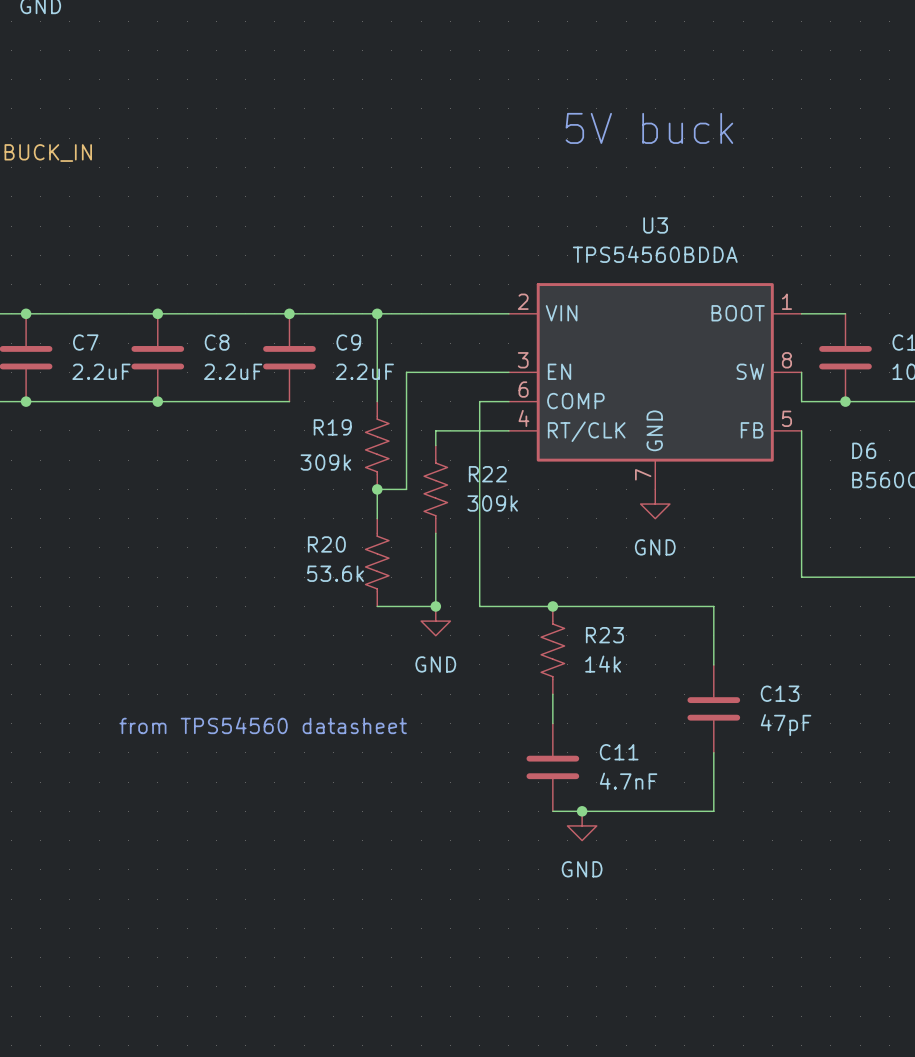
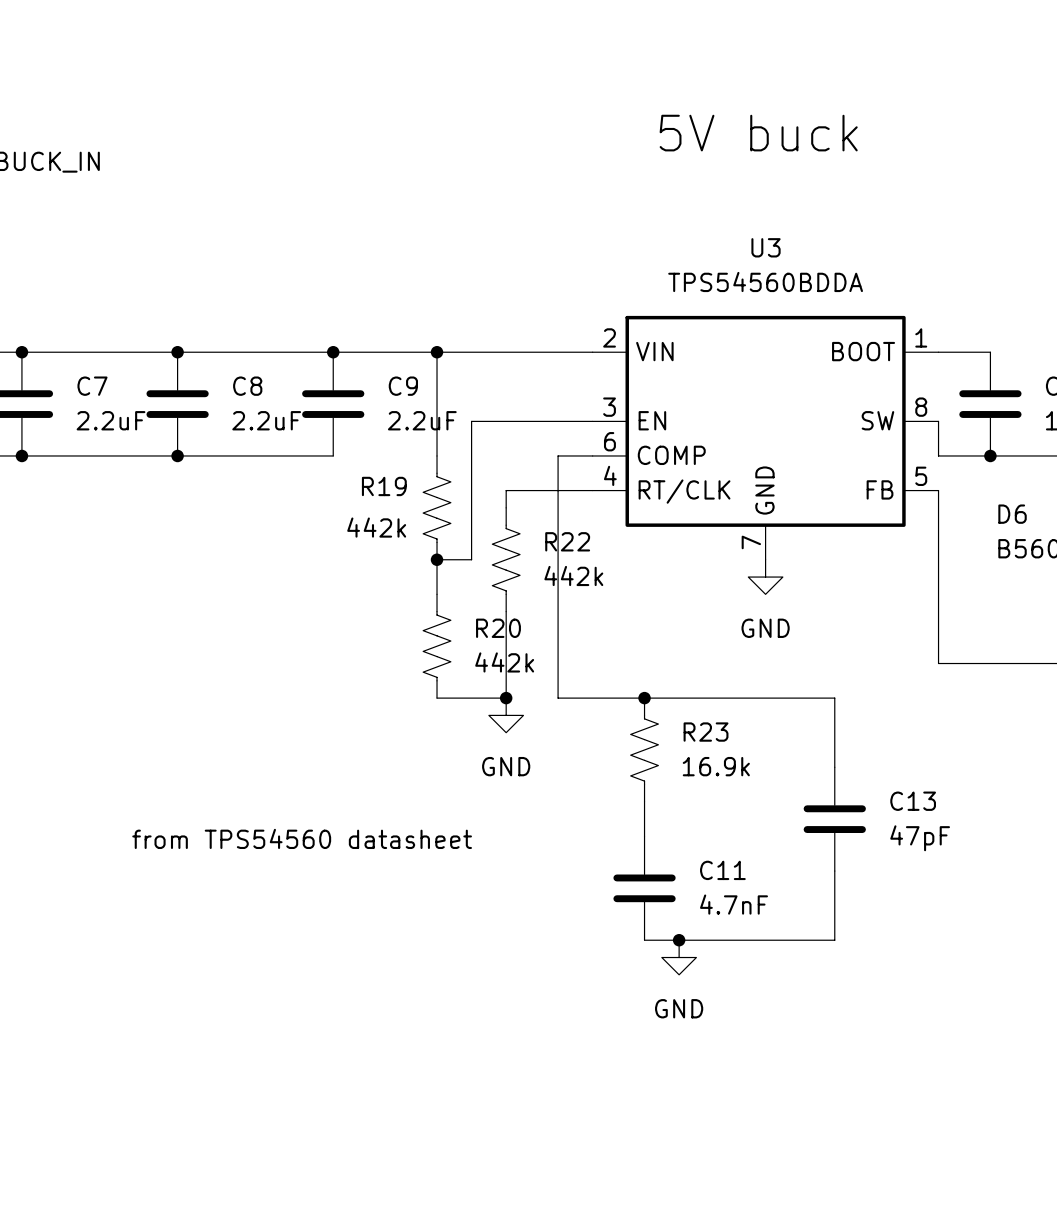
R19 value: 309k (325, 462) -> 442k (376, 527)
R22 value: 309k (492, 503) -> 442k (573, 575)
R20 name position: R20 (326, 544) -> R20 (498, 628)
R20 value: 53.6k (335, 573) -> 442k (504, 662)
R23 value: 14k (603, 664) -> 16.9k (716, 766)

